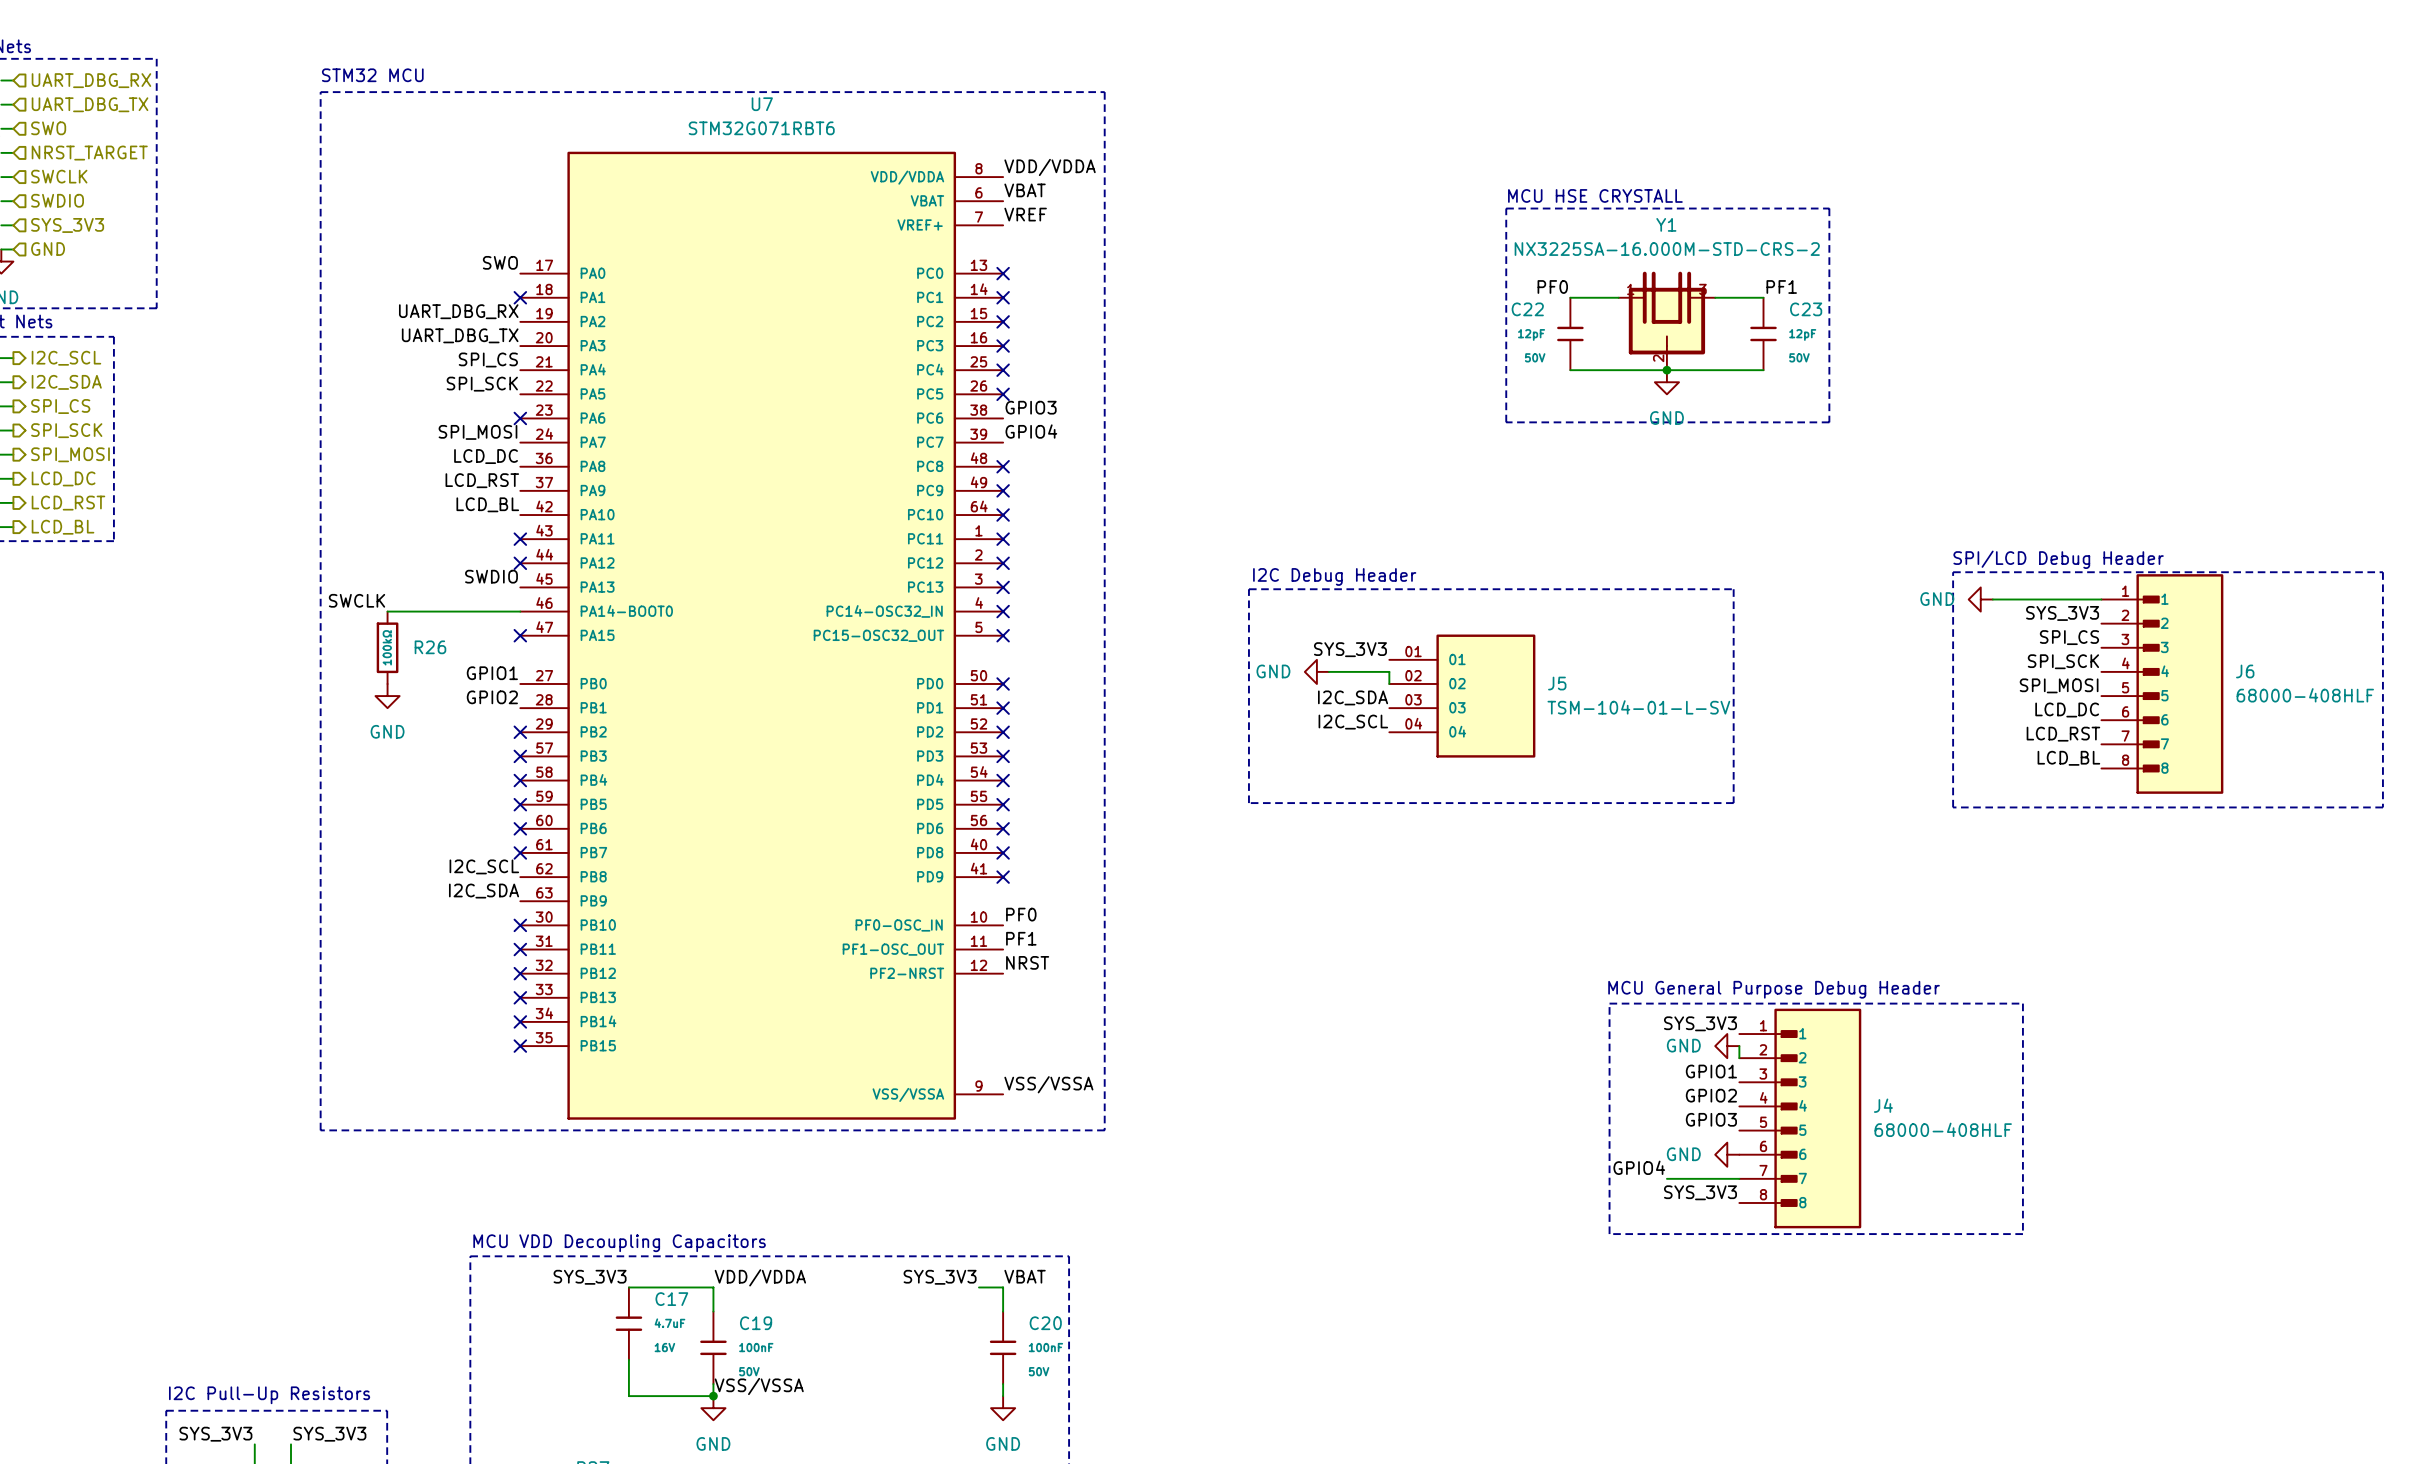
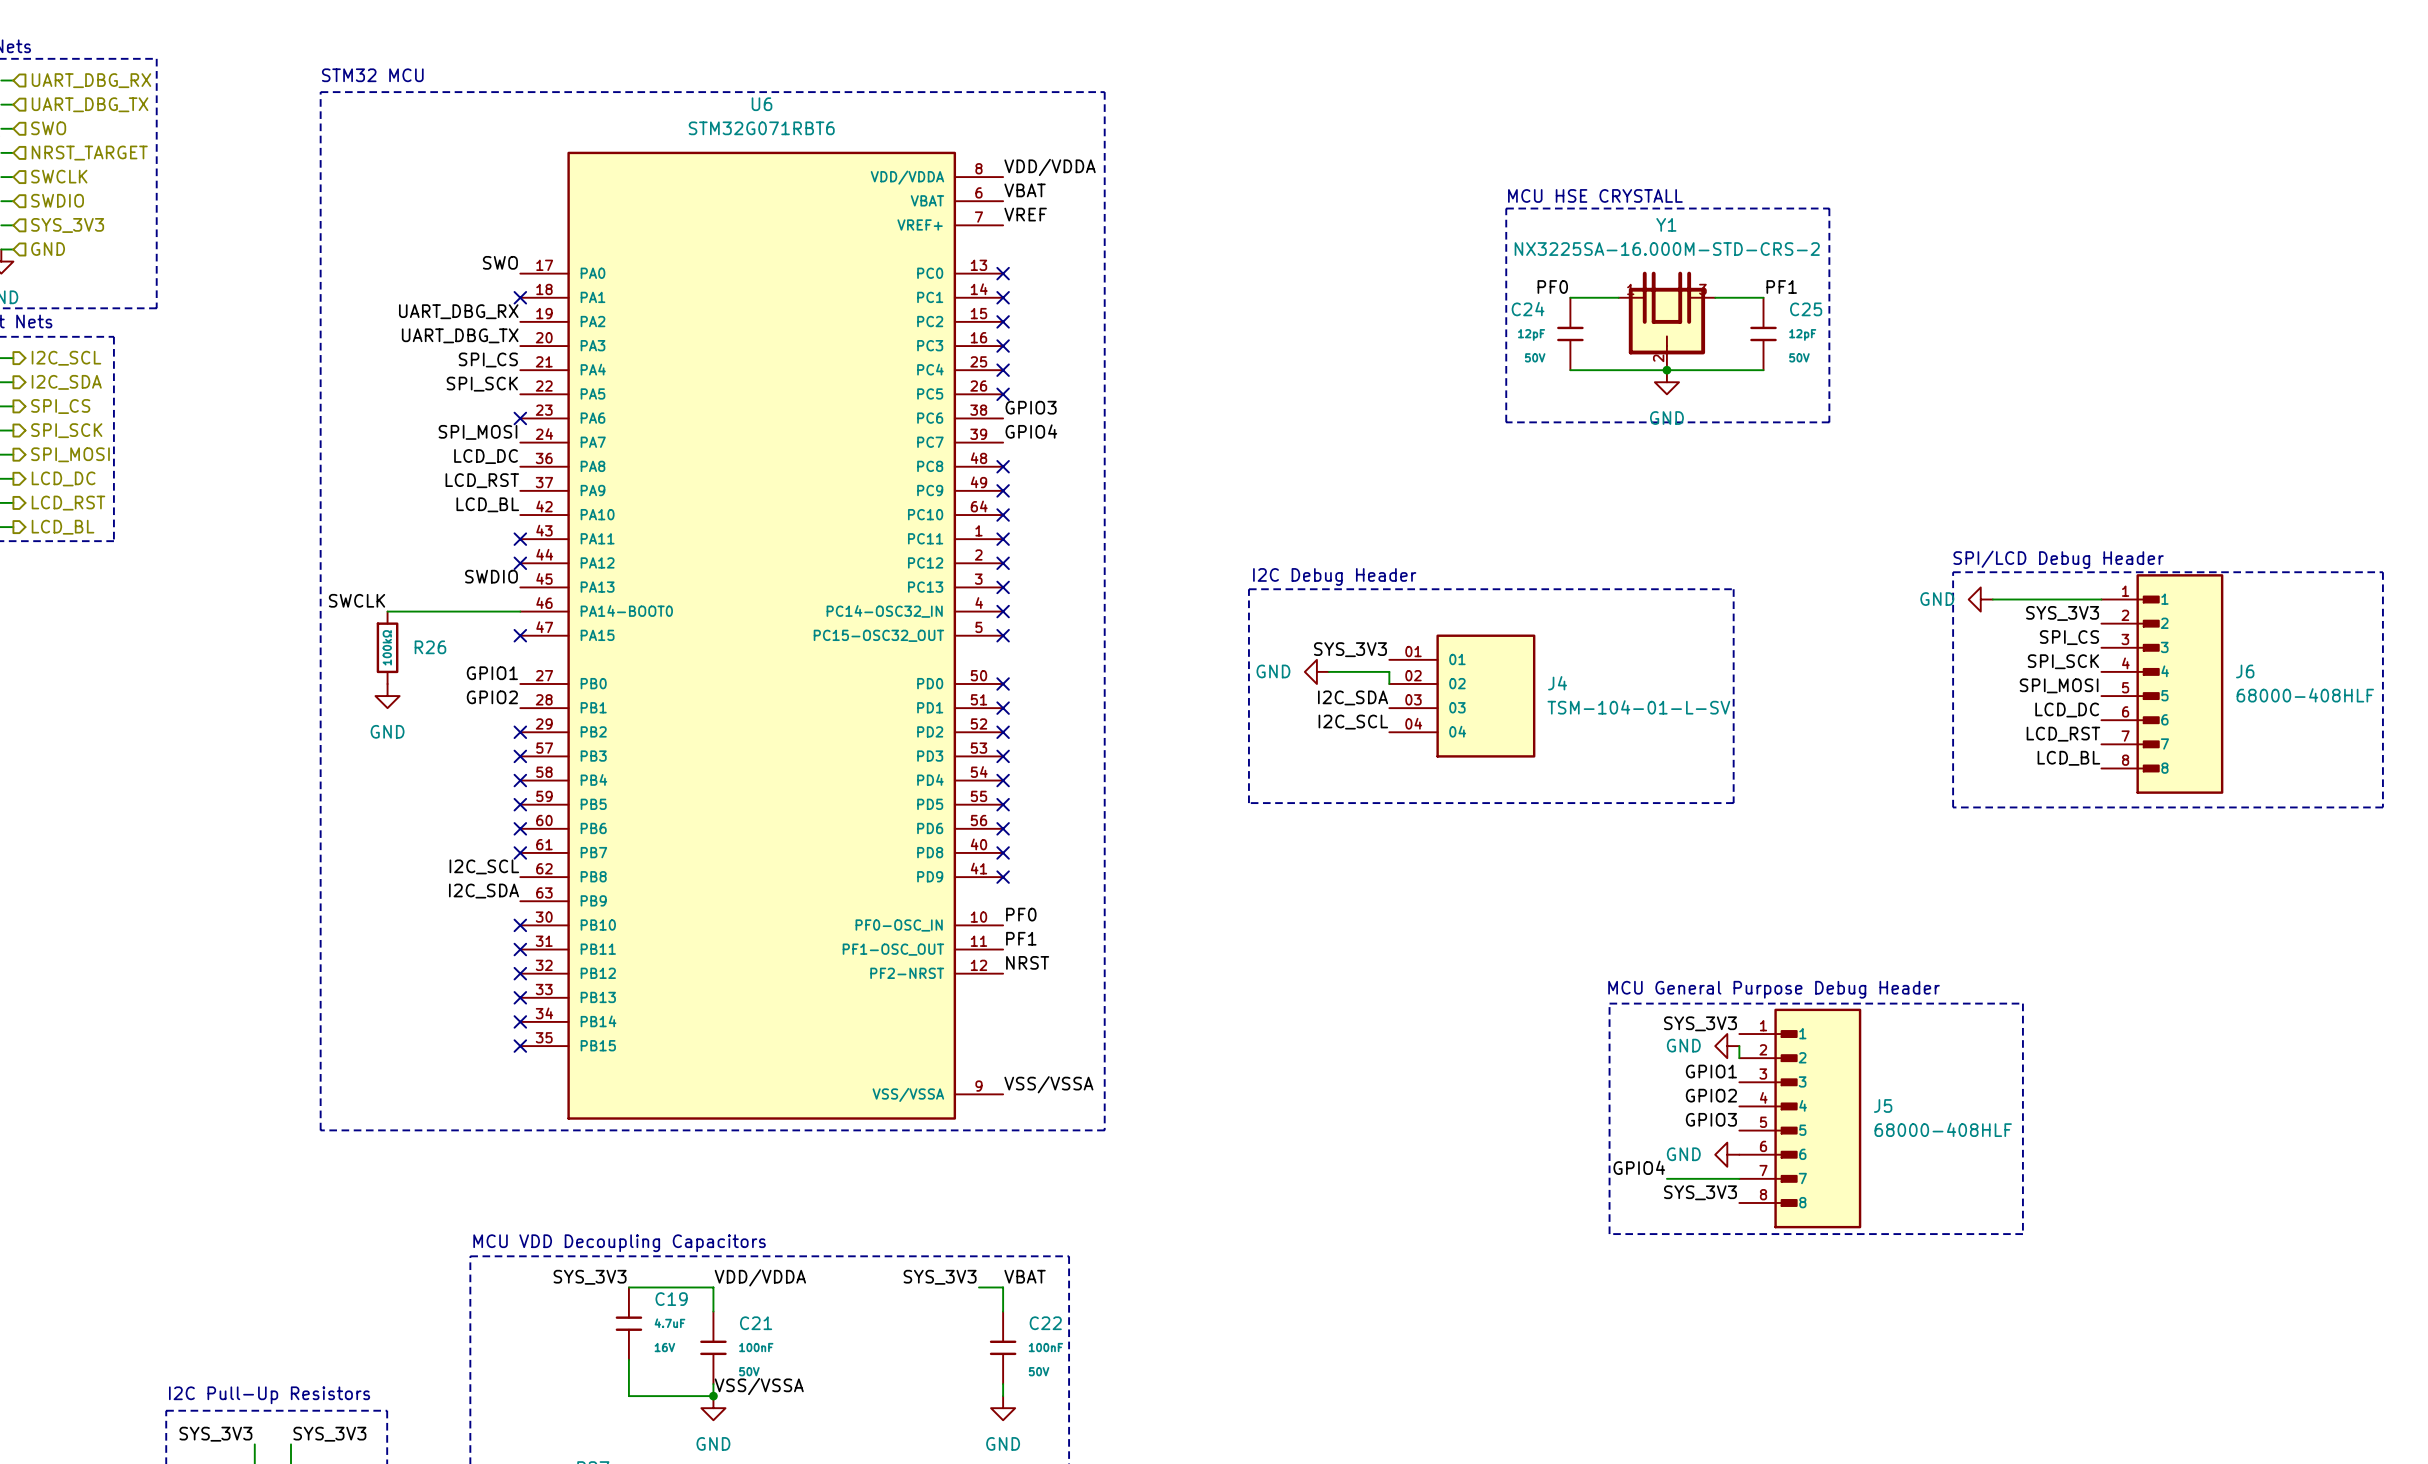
U7 name: U7 (762, 104) -> U6 (762, 104)
C22 name: C22 (1527, 309) -> C24 (1528, 309)
C23 name: C23 (1806, 309) -> C25 (1806, 309)
J5 name: J5 (1557, 683) -> J4 (1557, 683)
J4 name: J4 (1883, 1105) -> J5 (1883, 1105)
C17 name: C17 (671, 1299) -> C19 (671, 1299)
C19 name: C19 (756, 1323) -> C21 (756, 1323)
C20 name: C20 (1045, 1323) -> C22 (1045, 1323)

